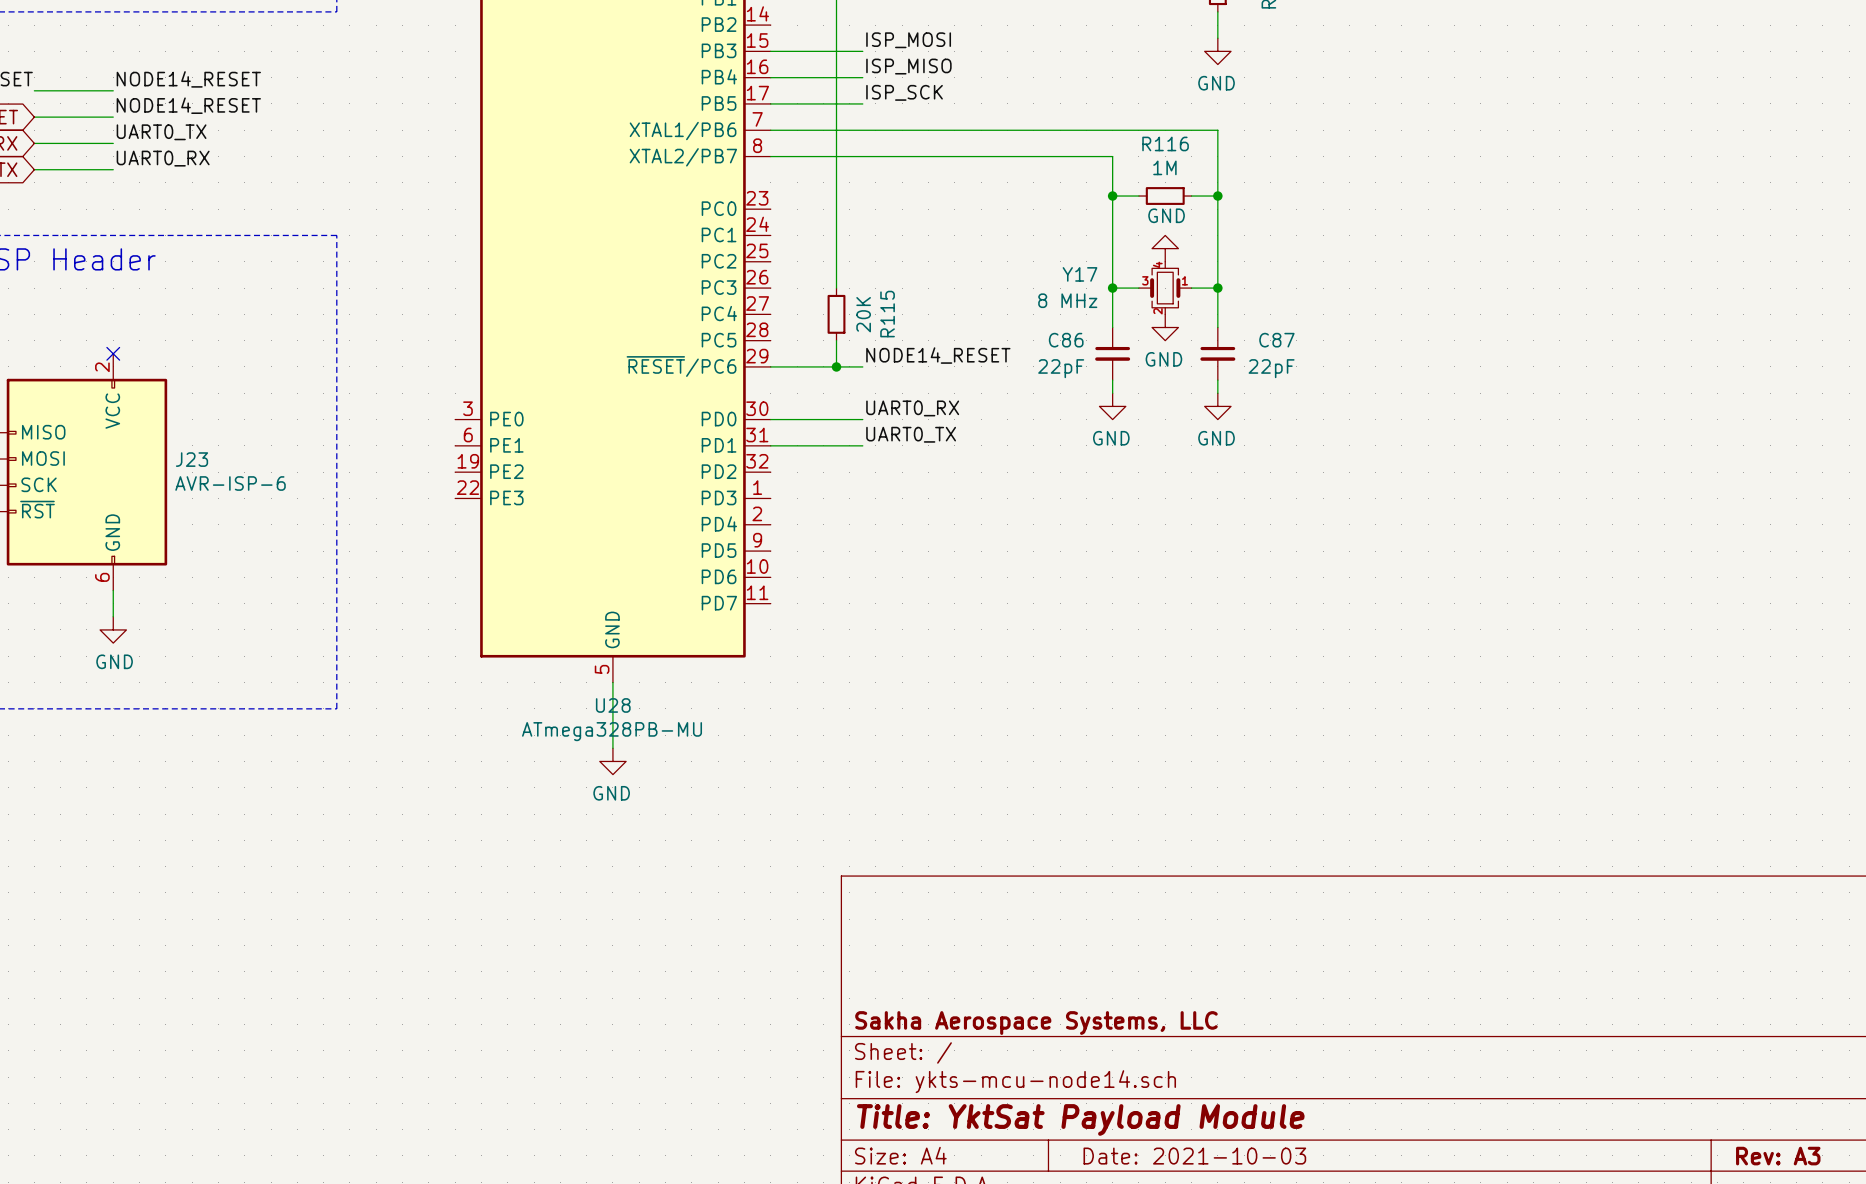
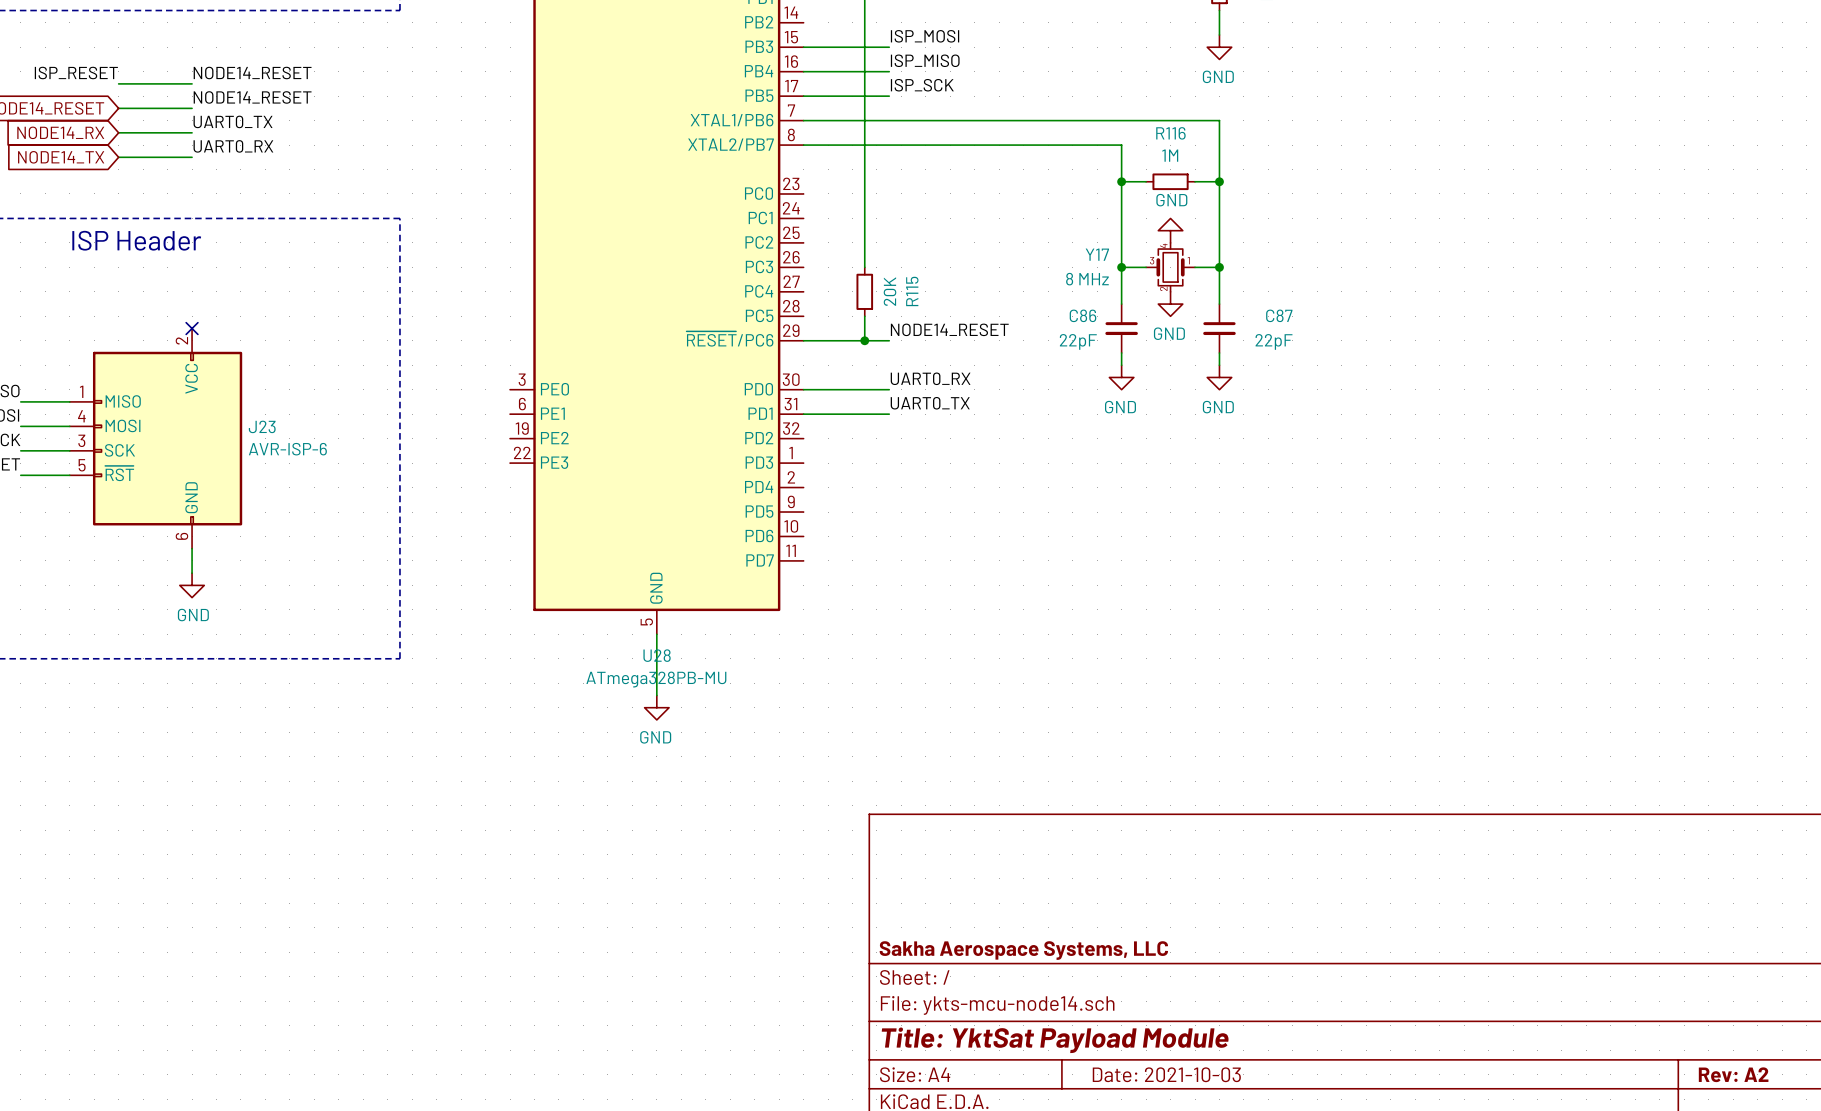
title block: Rev: A3 (1778, 1156) -> Rev: A2 (1733, 1074)

